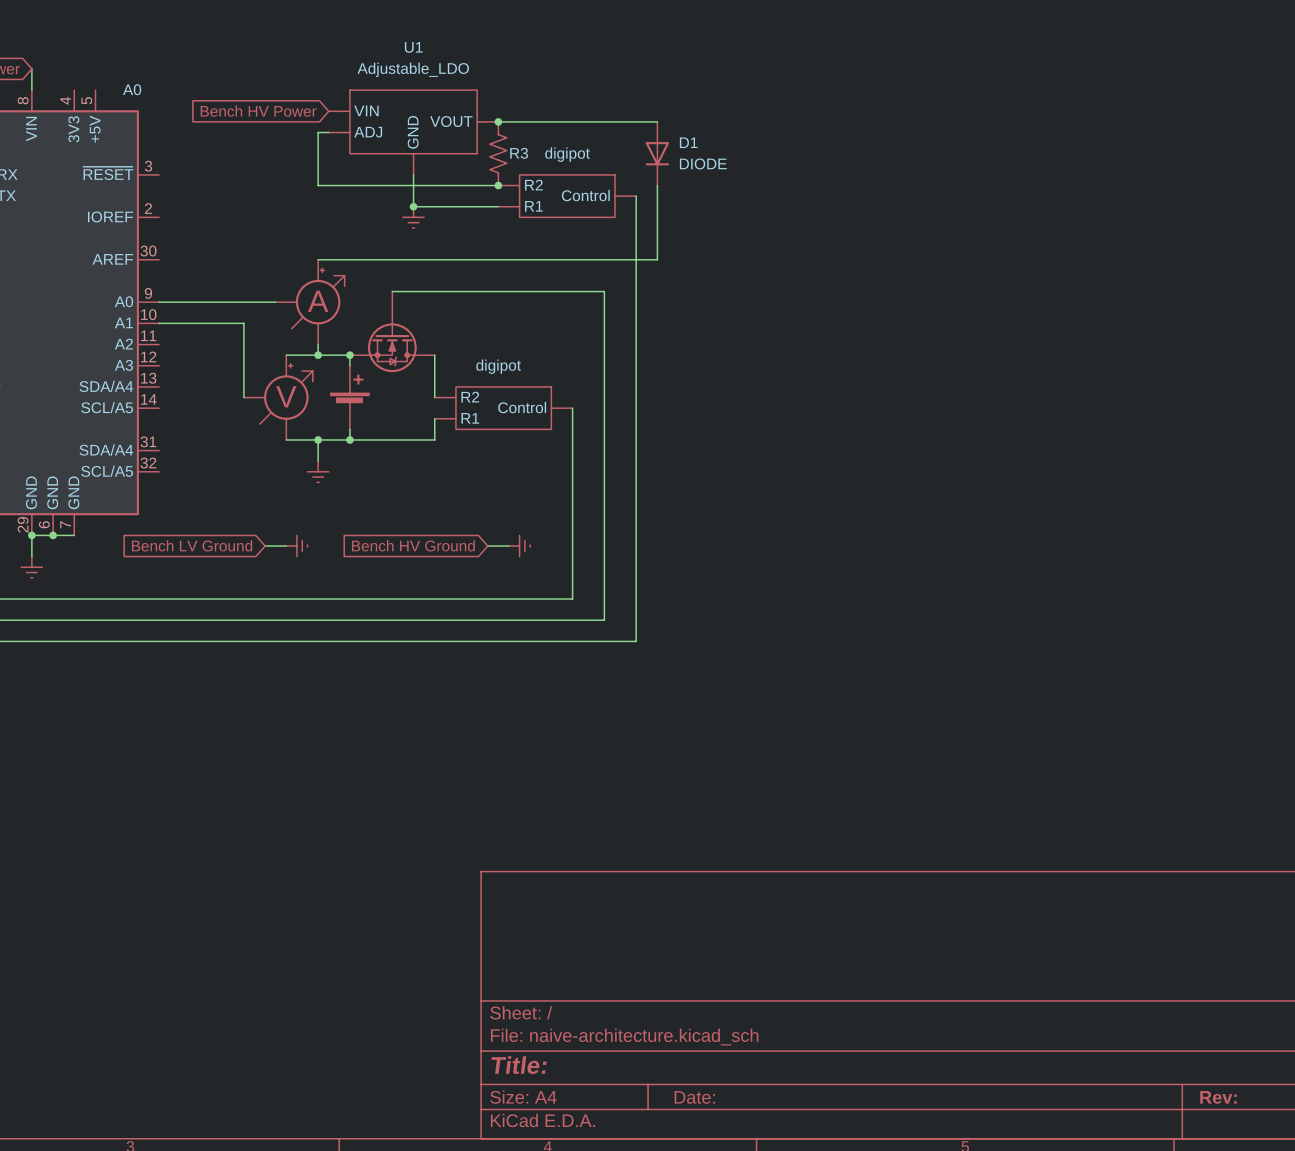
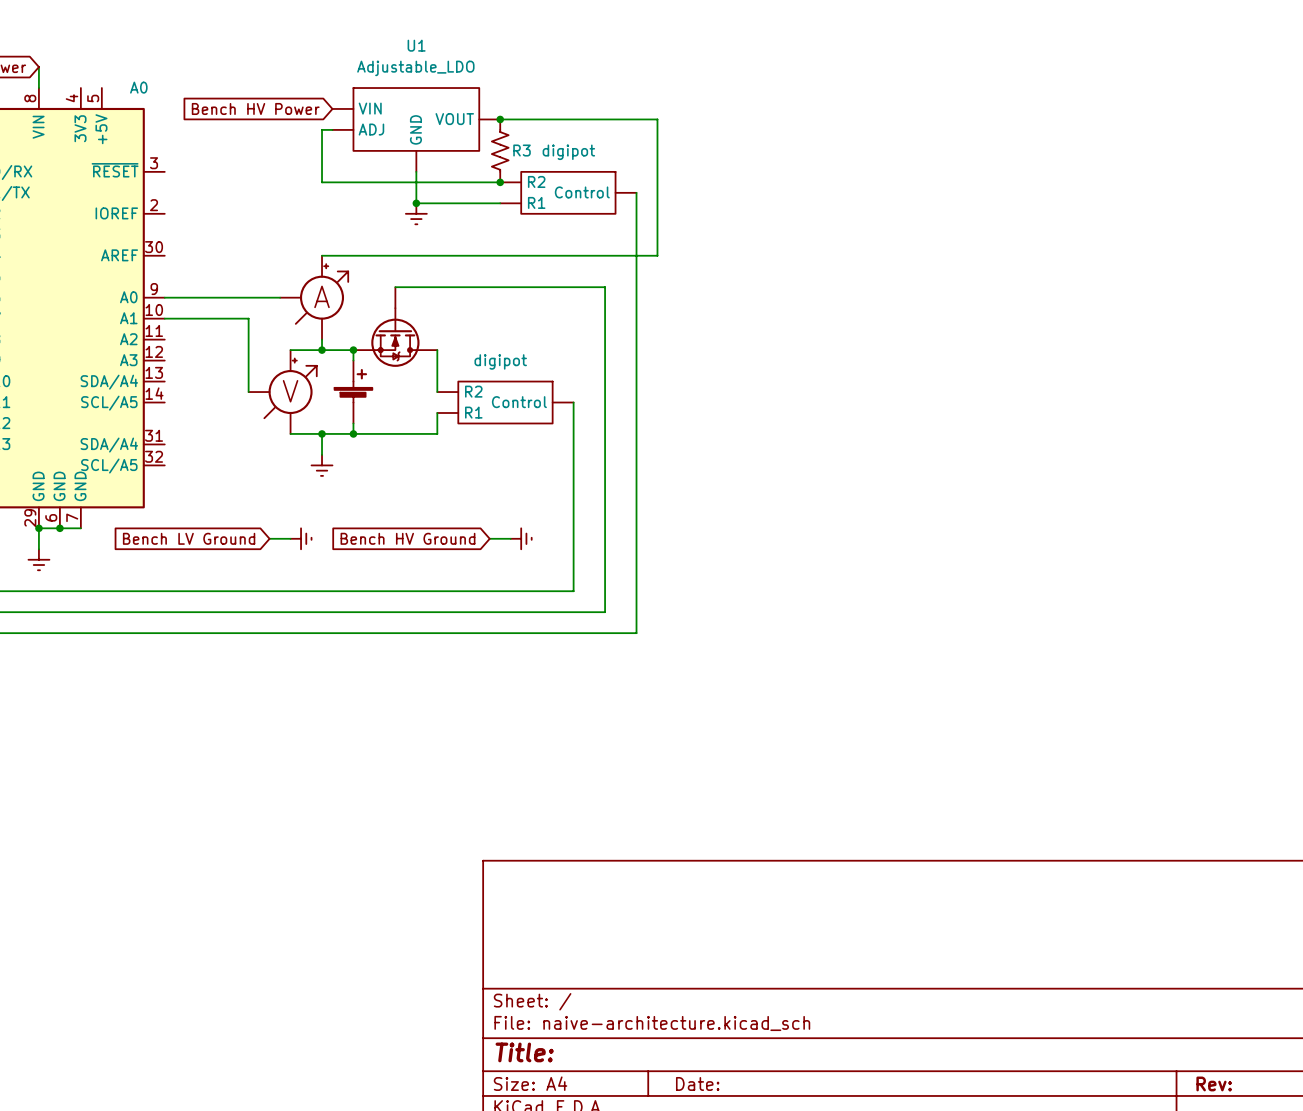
D1: DIODE (657, 153) -> none

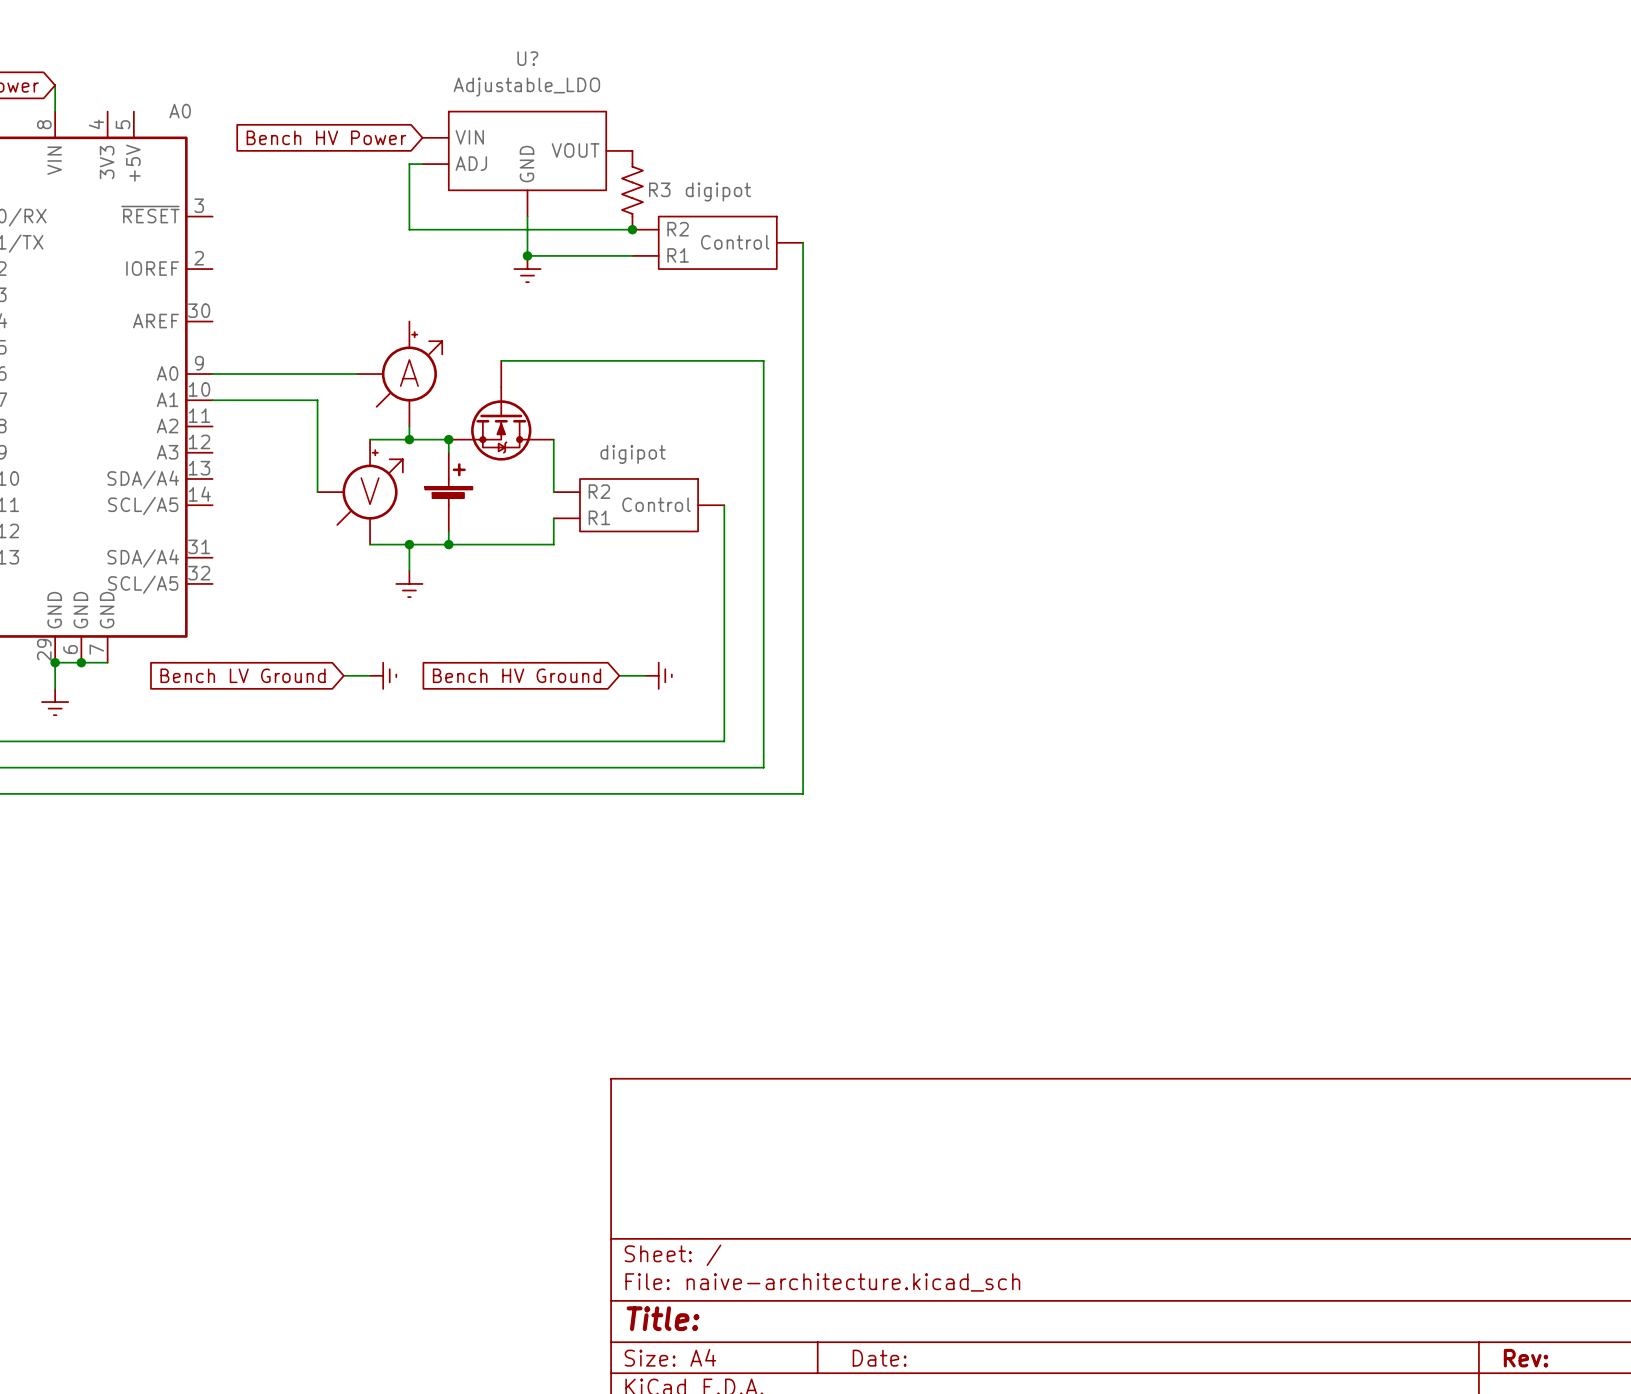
U1 name: U1 (416, 45) -> U? (527, 58)
wire: (500, 119) (657, 119) (657, 255) (322, 255) -> none
junction: (500, 119) -> none

